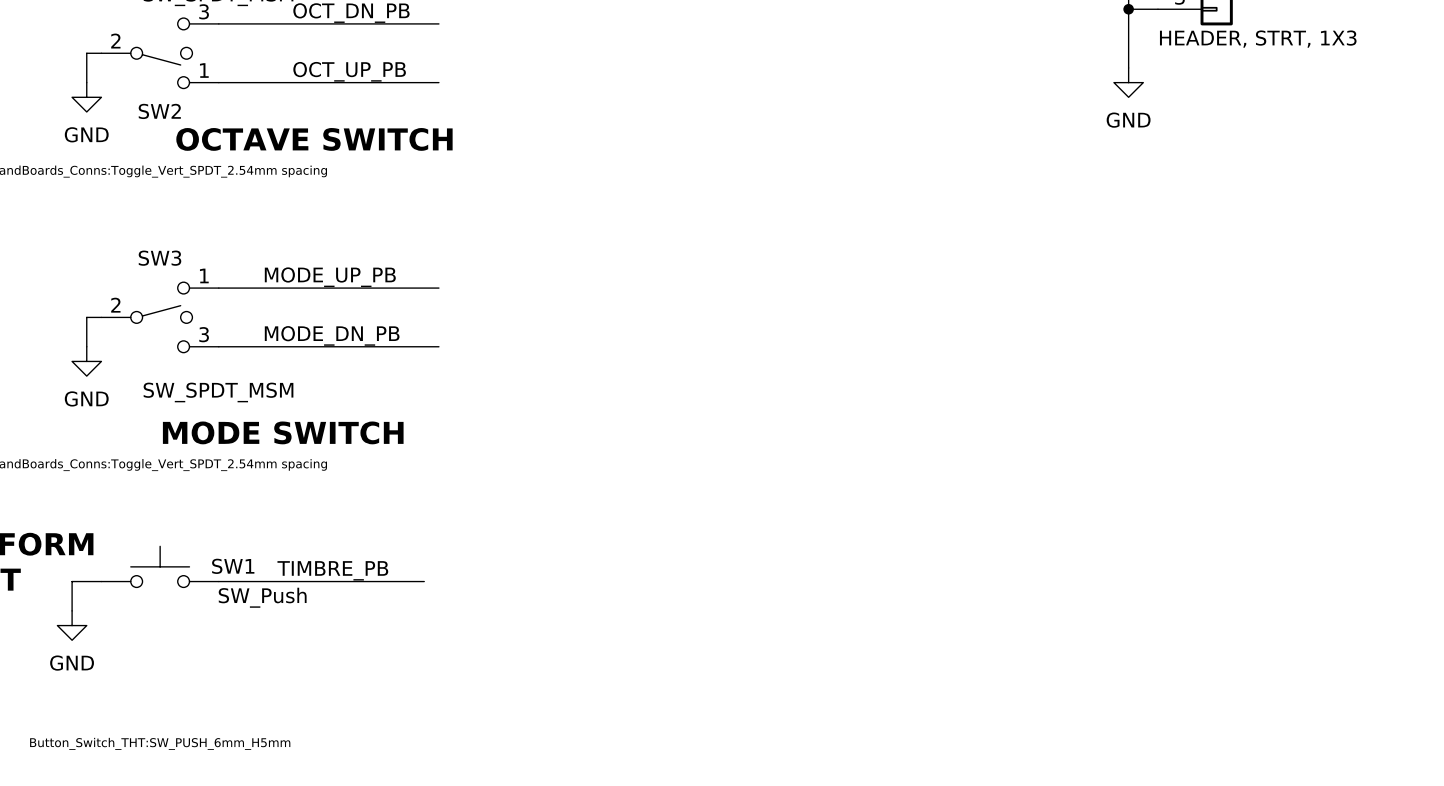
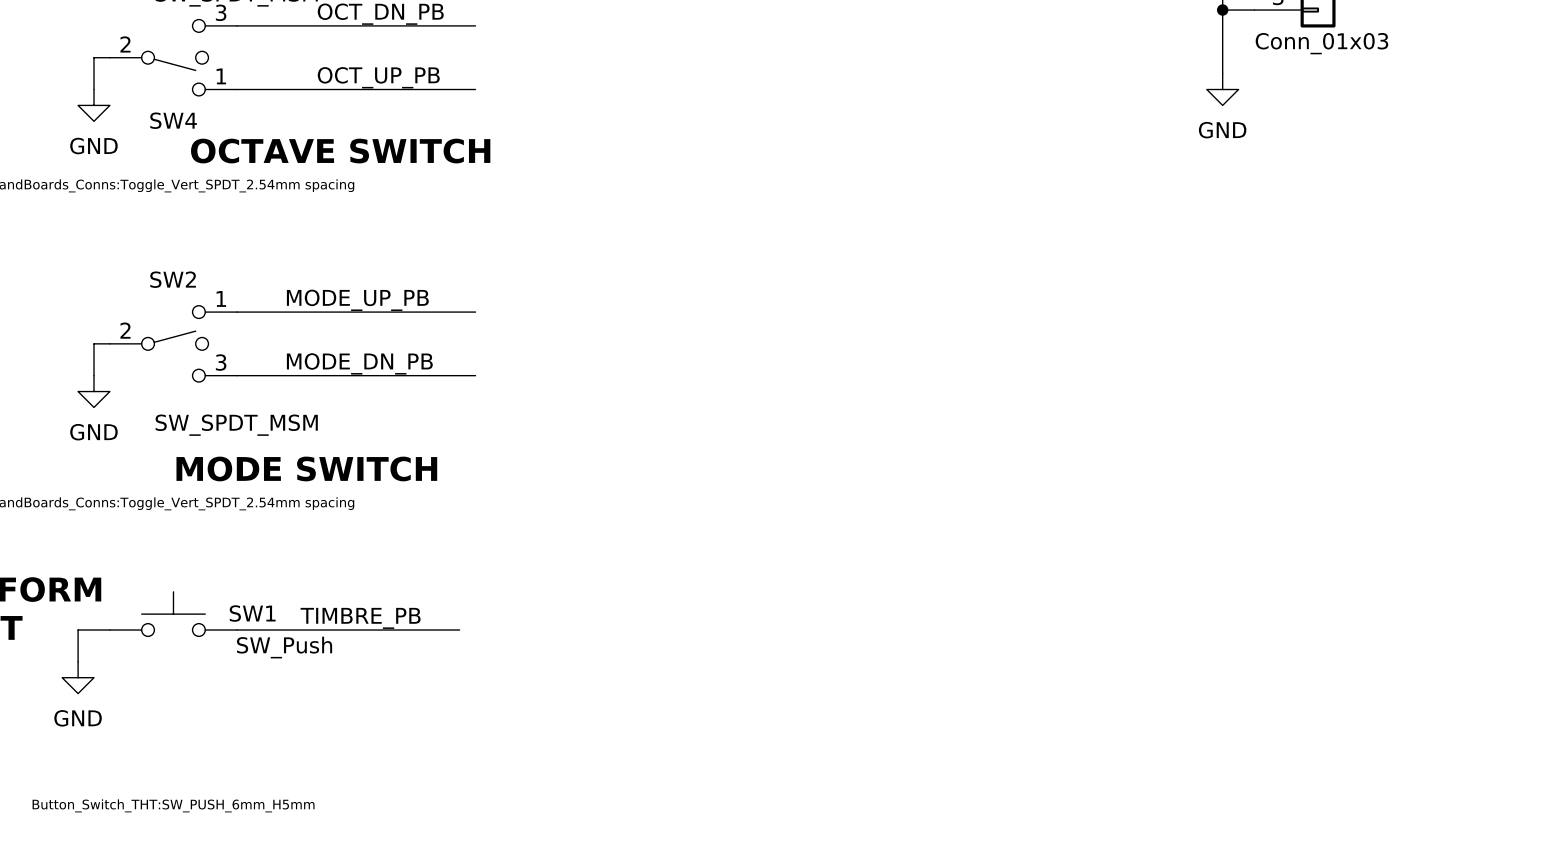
part value: HEADER, STRT, 1X3 (1258, 39) -> Conn_01x03 (1321, 43)
SW2 name: SW2 (159, 111) -> SW4 (173, 120)
SW3 name: SW3 (159, 258) -> SW2 (173, 279)

